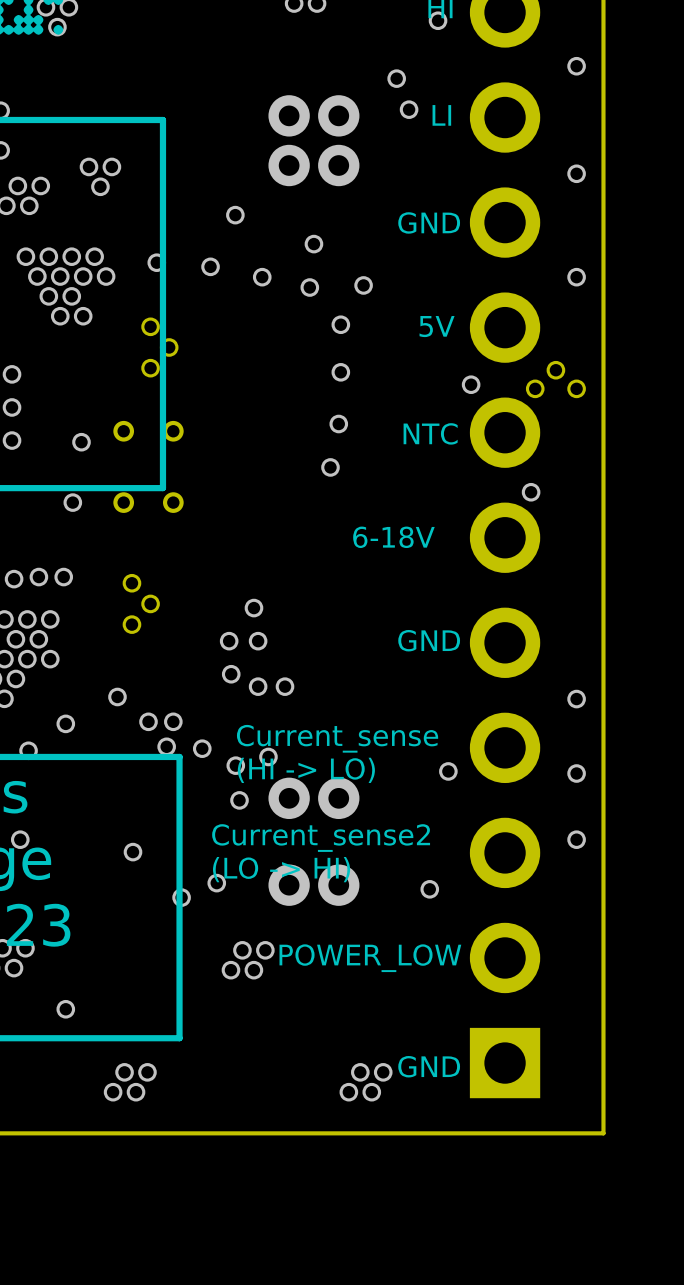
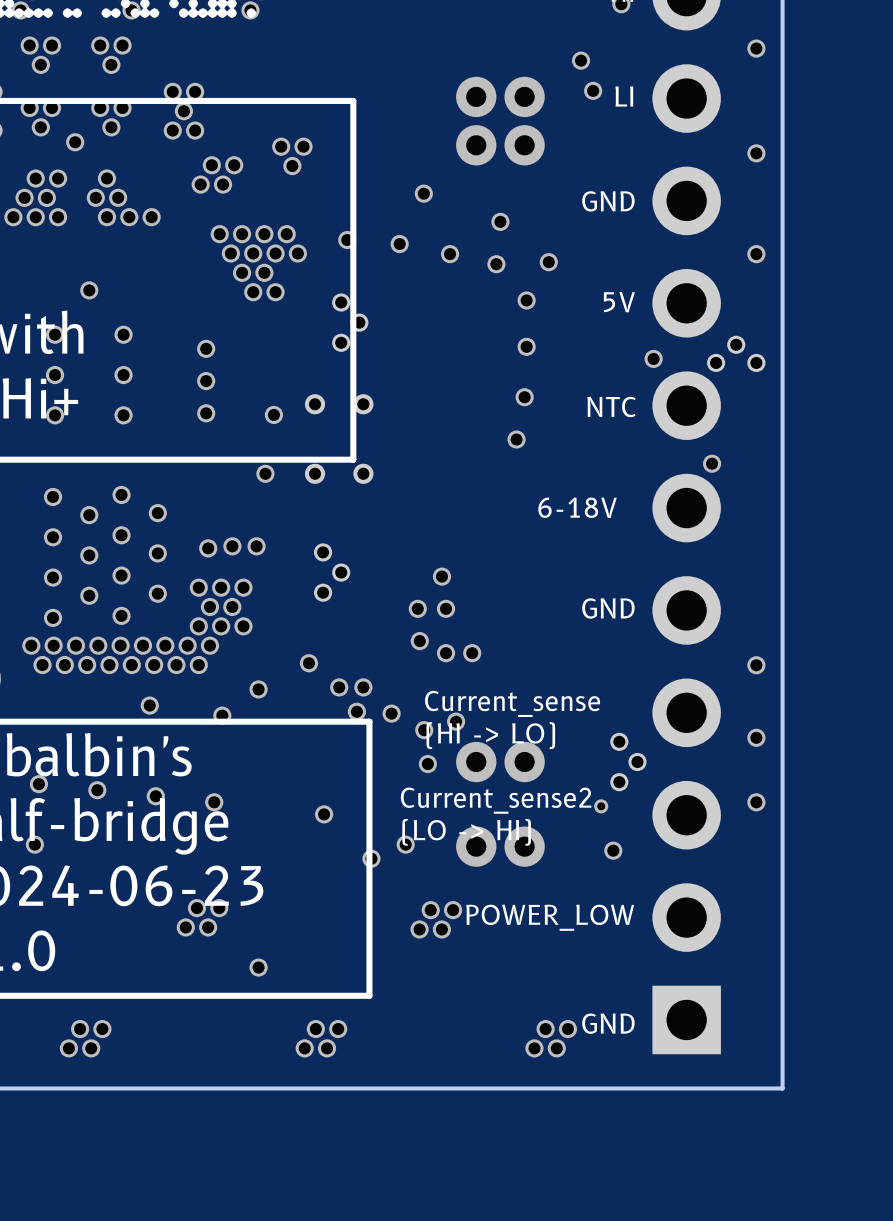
via: (448, 771) -> none
part: none -> (628, 762)
via: none -> (601, 806)

